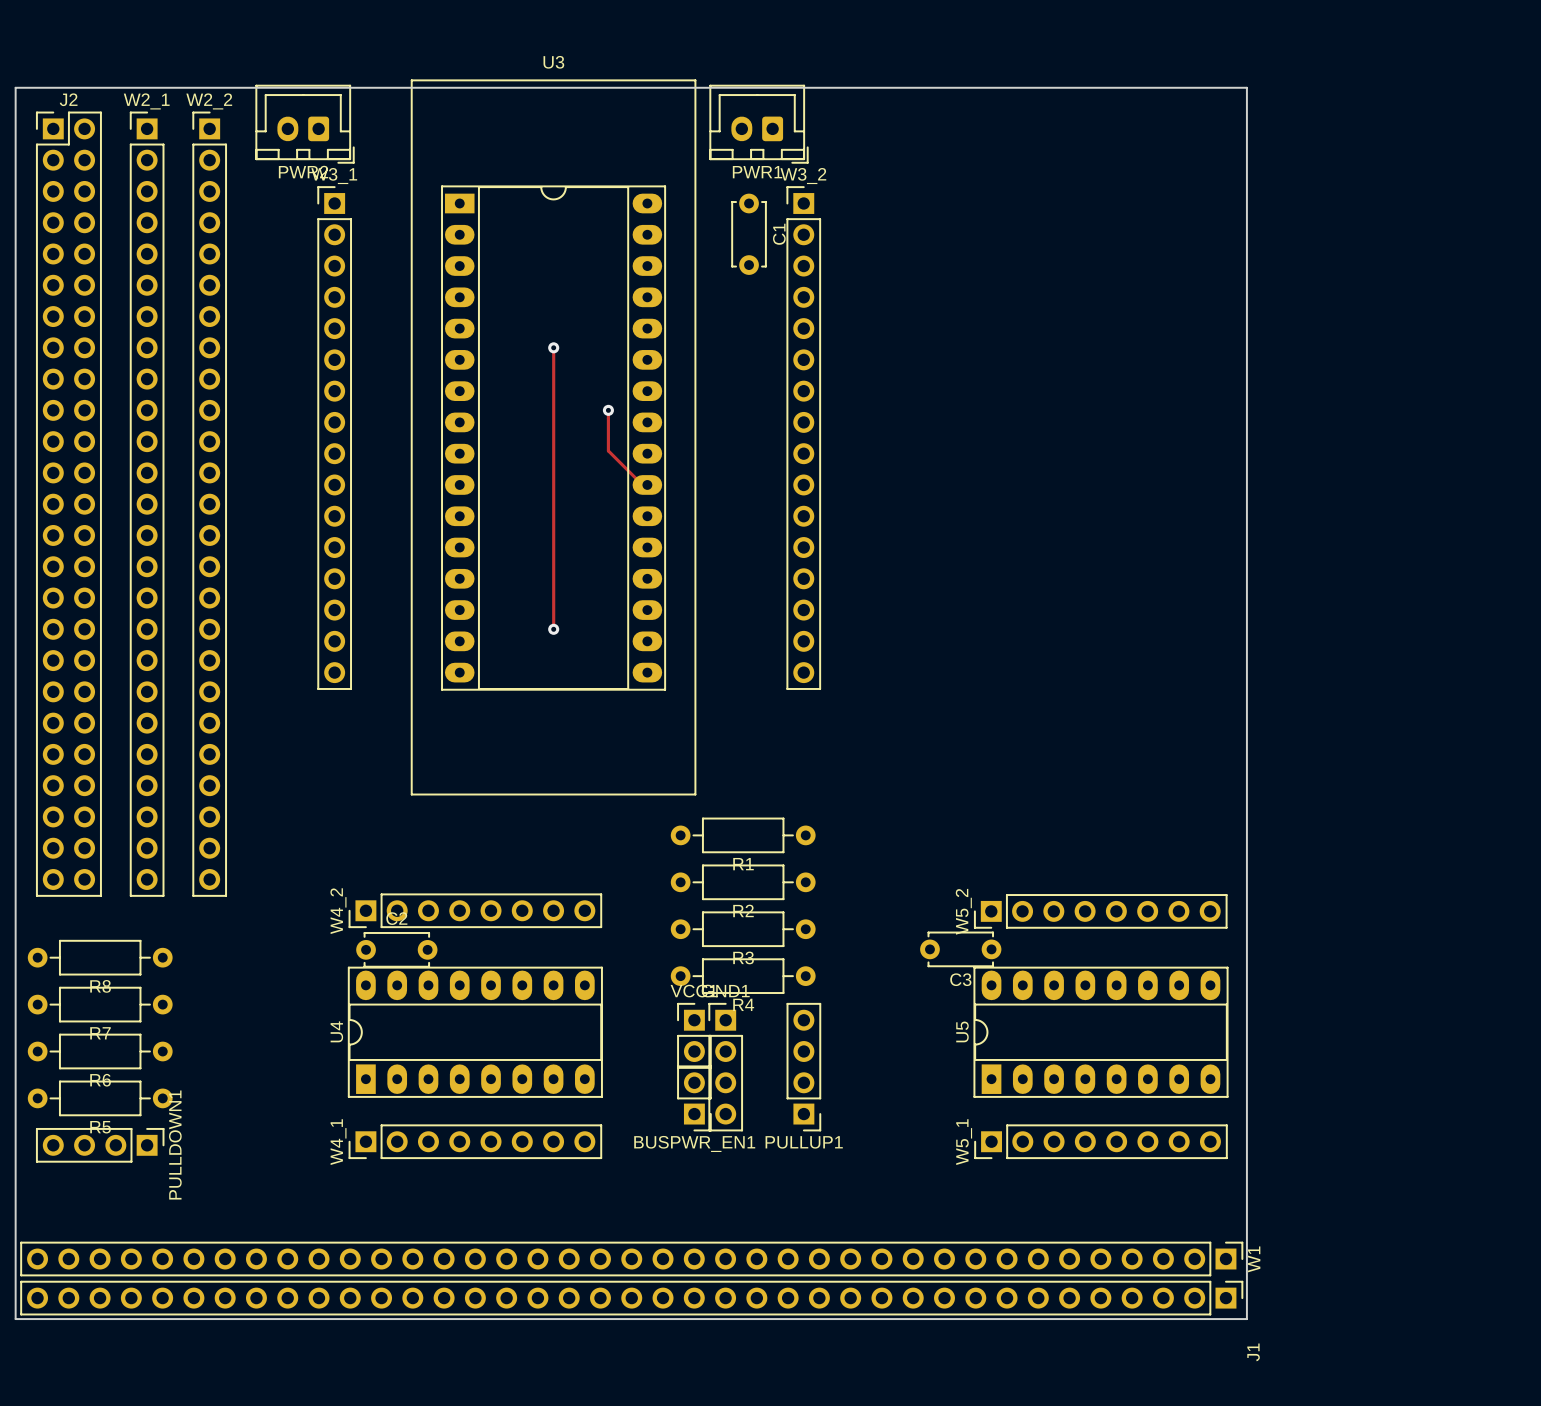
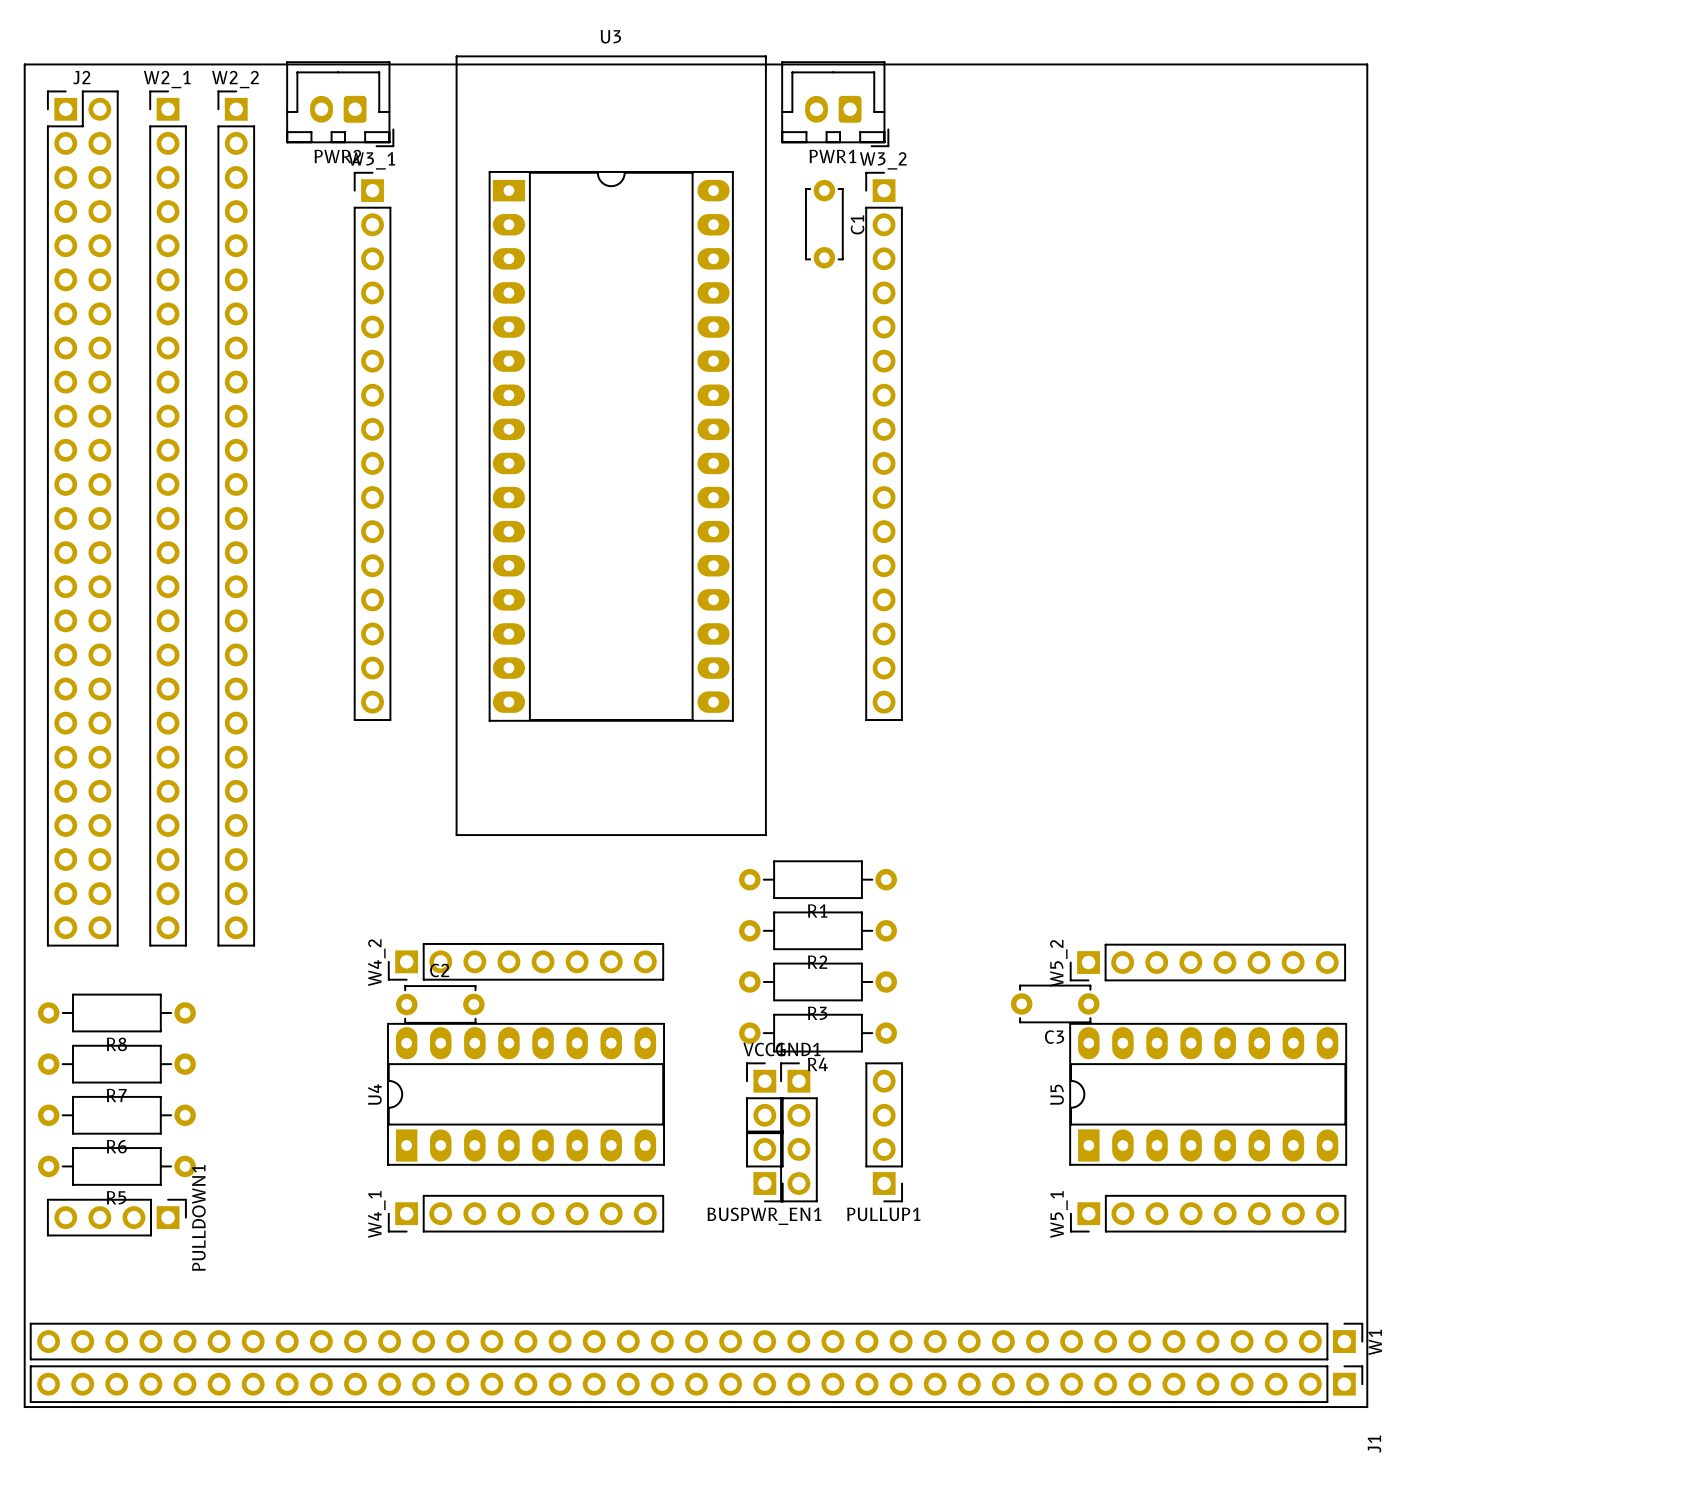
track: (553, 347) (553, 629) -> none
via: (553, 347) -> none
track: (608, 410) (608, 450) (642, 484) -> none
via: (608, 410) -> none
via: (553, 629) -> none

